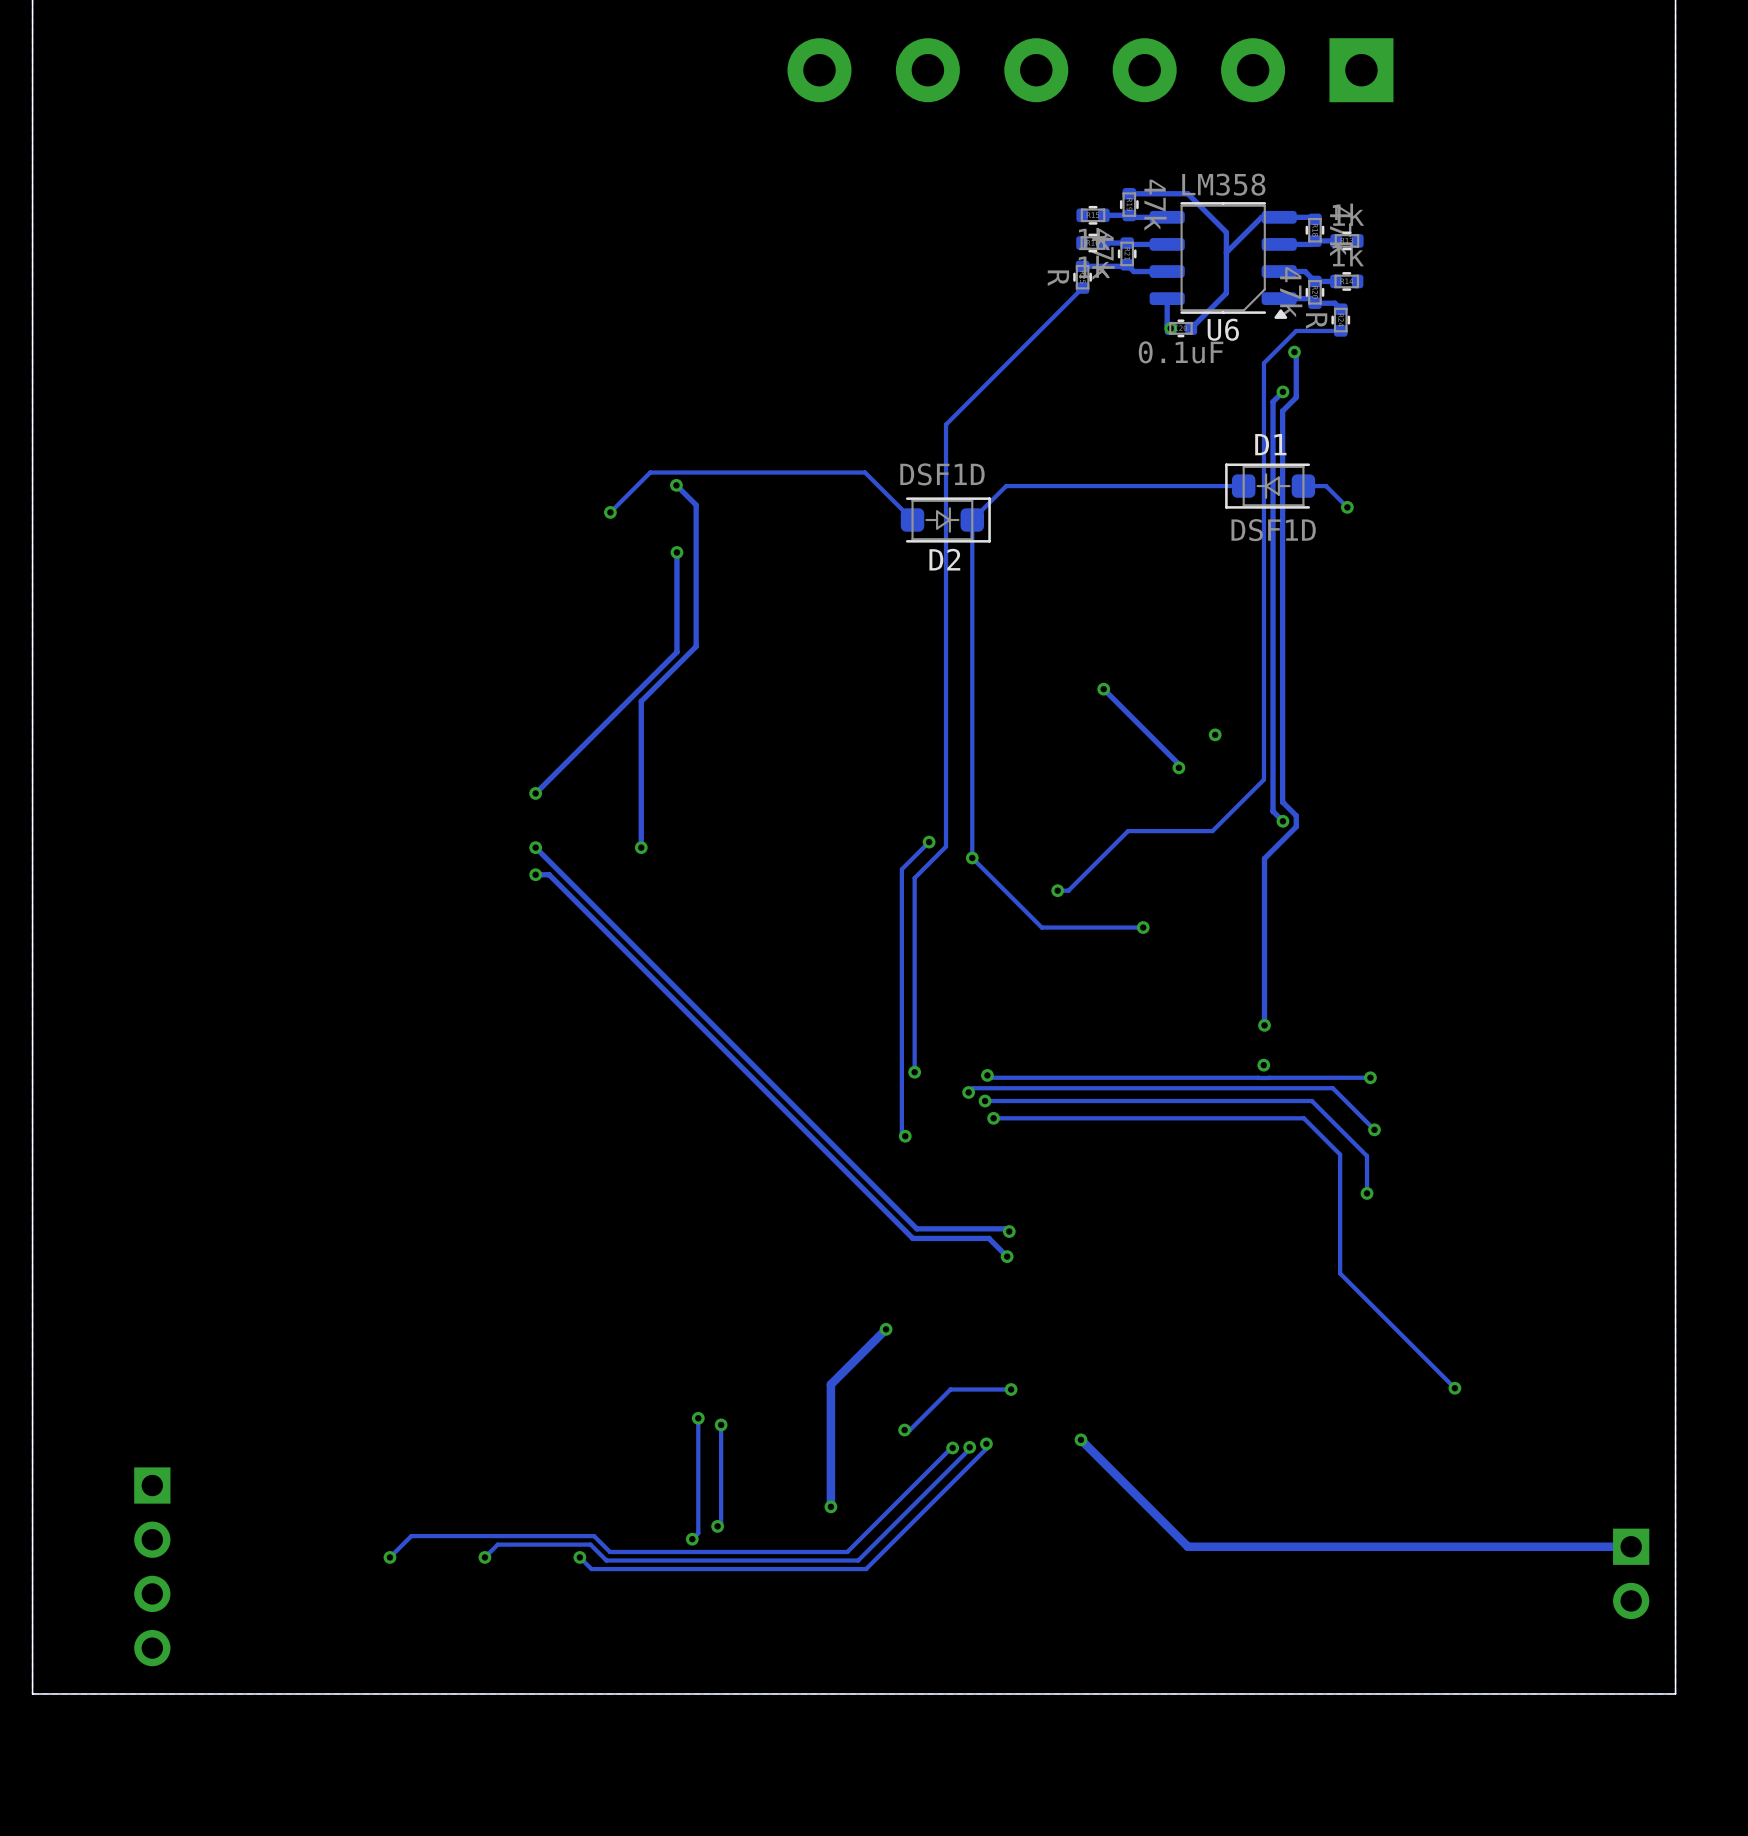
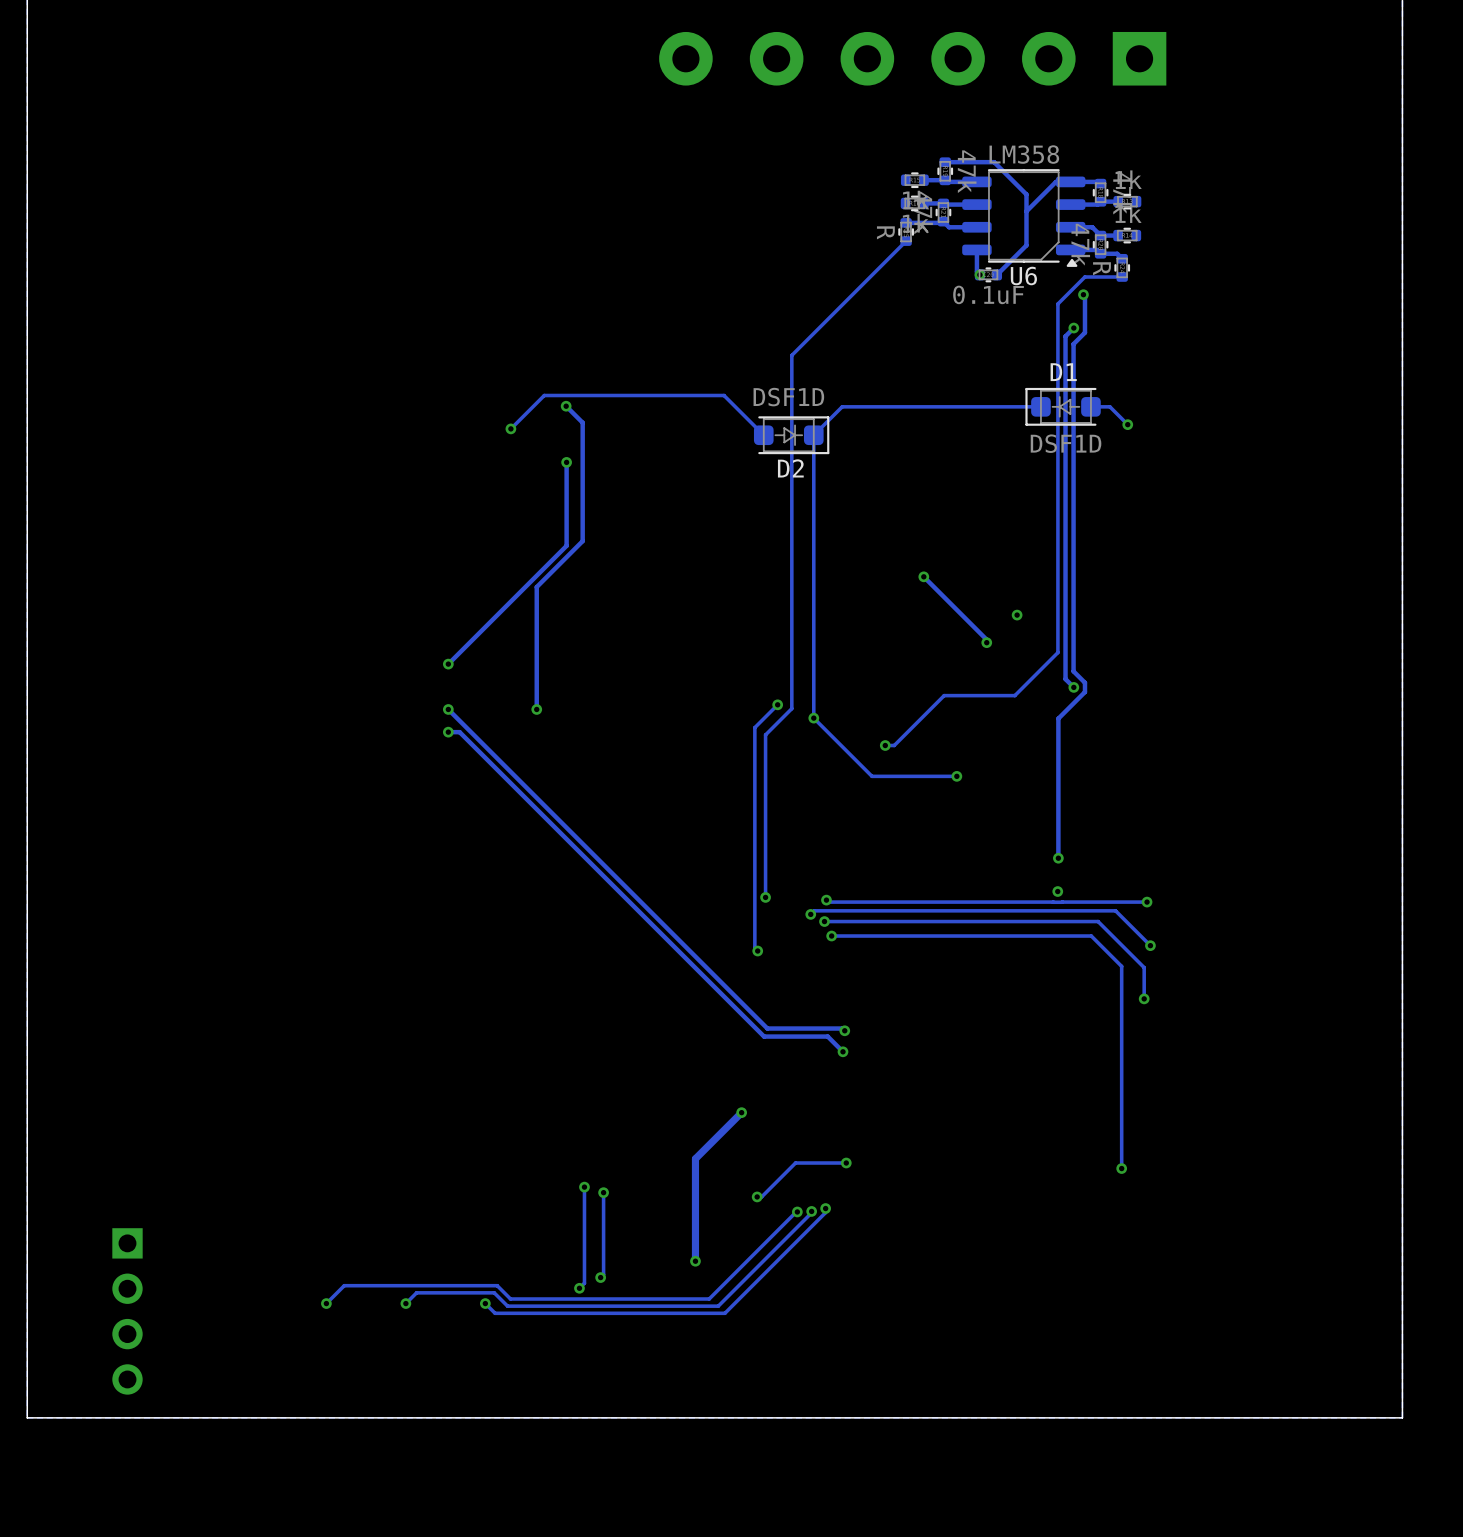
track: (1340, 1273) (1454, 1388) -> (1121, 1065) (1121, 1168)
via position: (1454, 1388) -> (1121, 1168)
track: (1080, 1439) (1187, 1546) (1631, 1546) -> none
via: (1080, 1439) -> none
part: (1631, 1573) -> none

